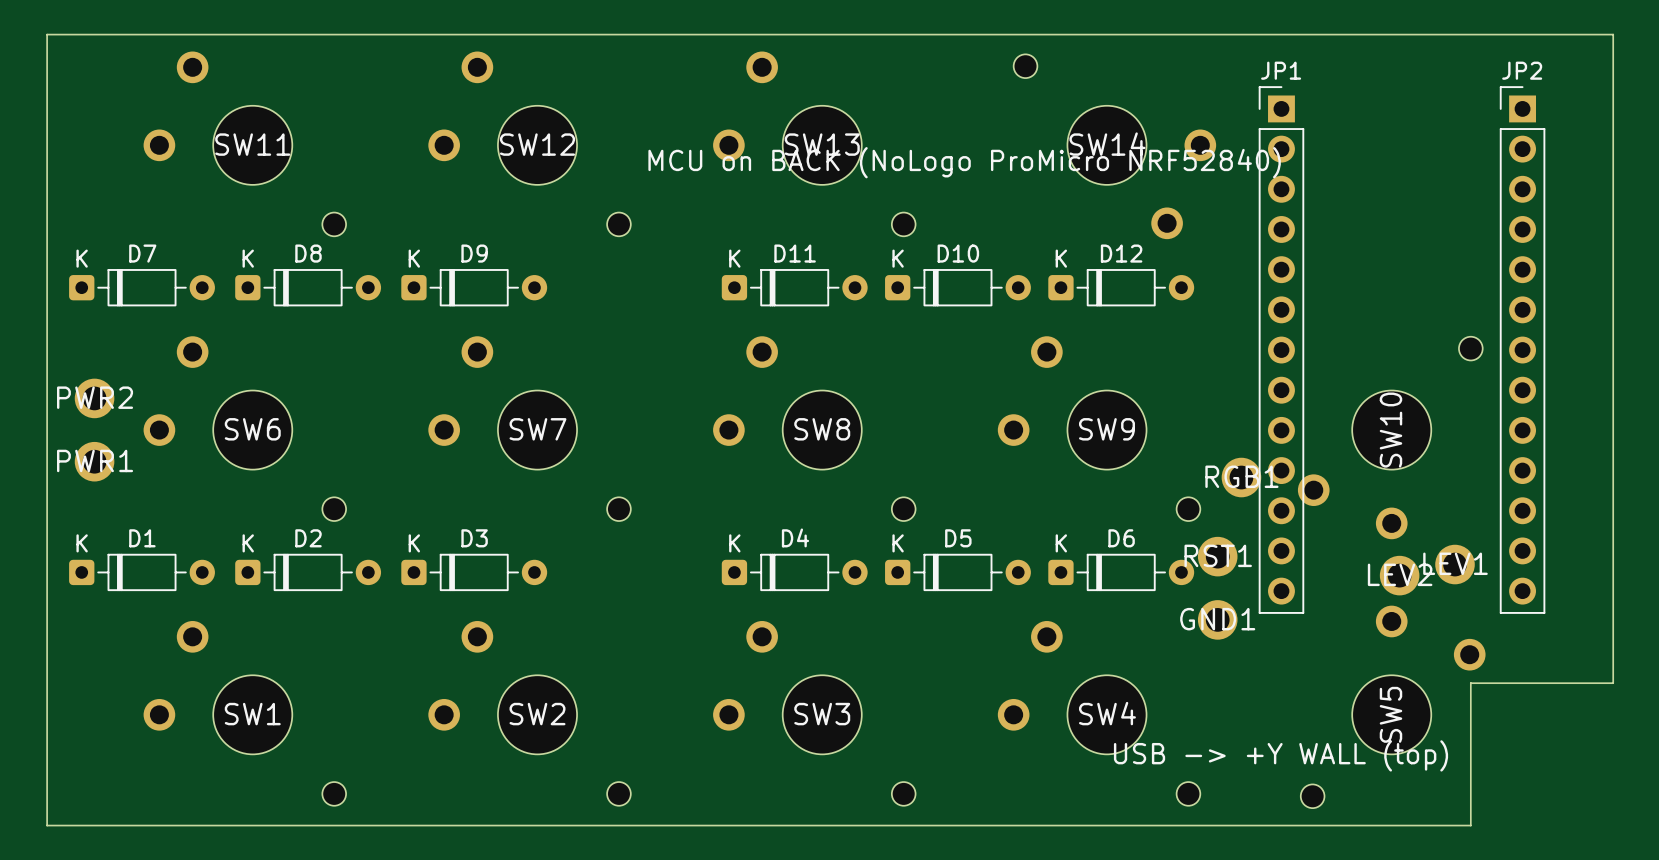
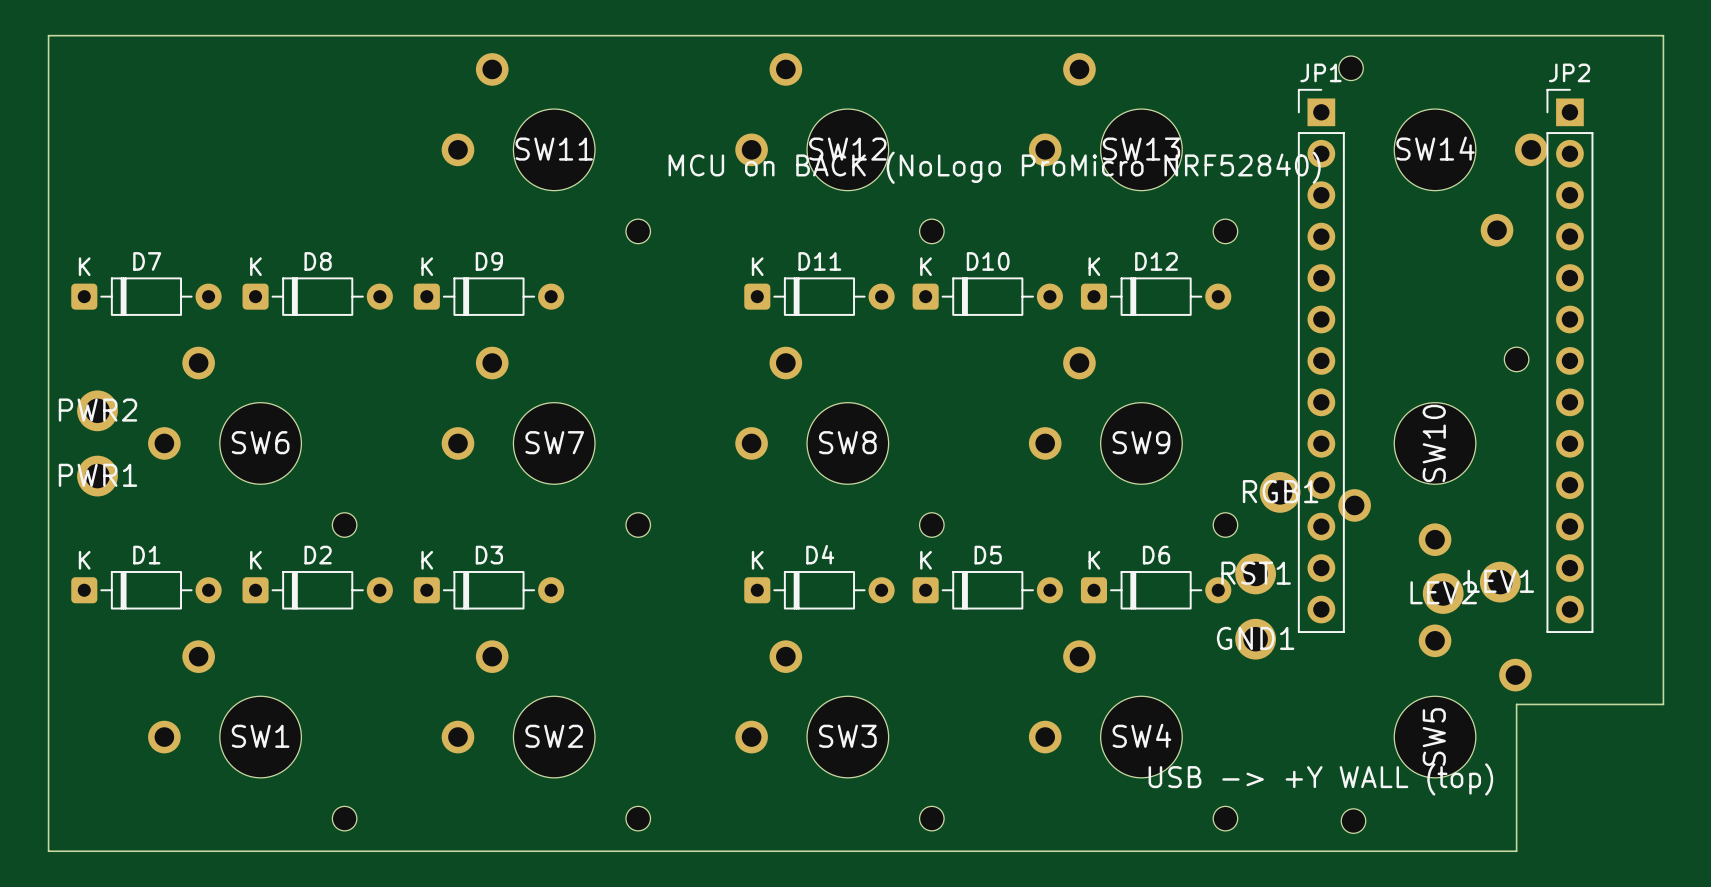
SW11: (244, 143) -> none
SW13: none -> (1133, 148)
SW12 name: SW12 (537, 144) -> SW11 (554, 149)
SW13 name: SW13 (822, 144) -> SW12 (847, 149)
SW14 position: (1114, 146) -> (1443, 151)

